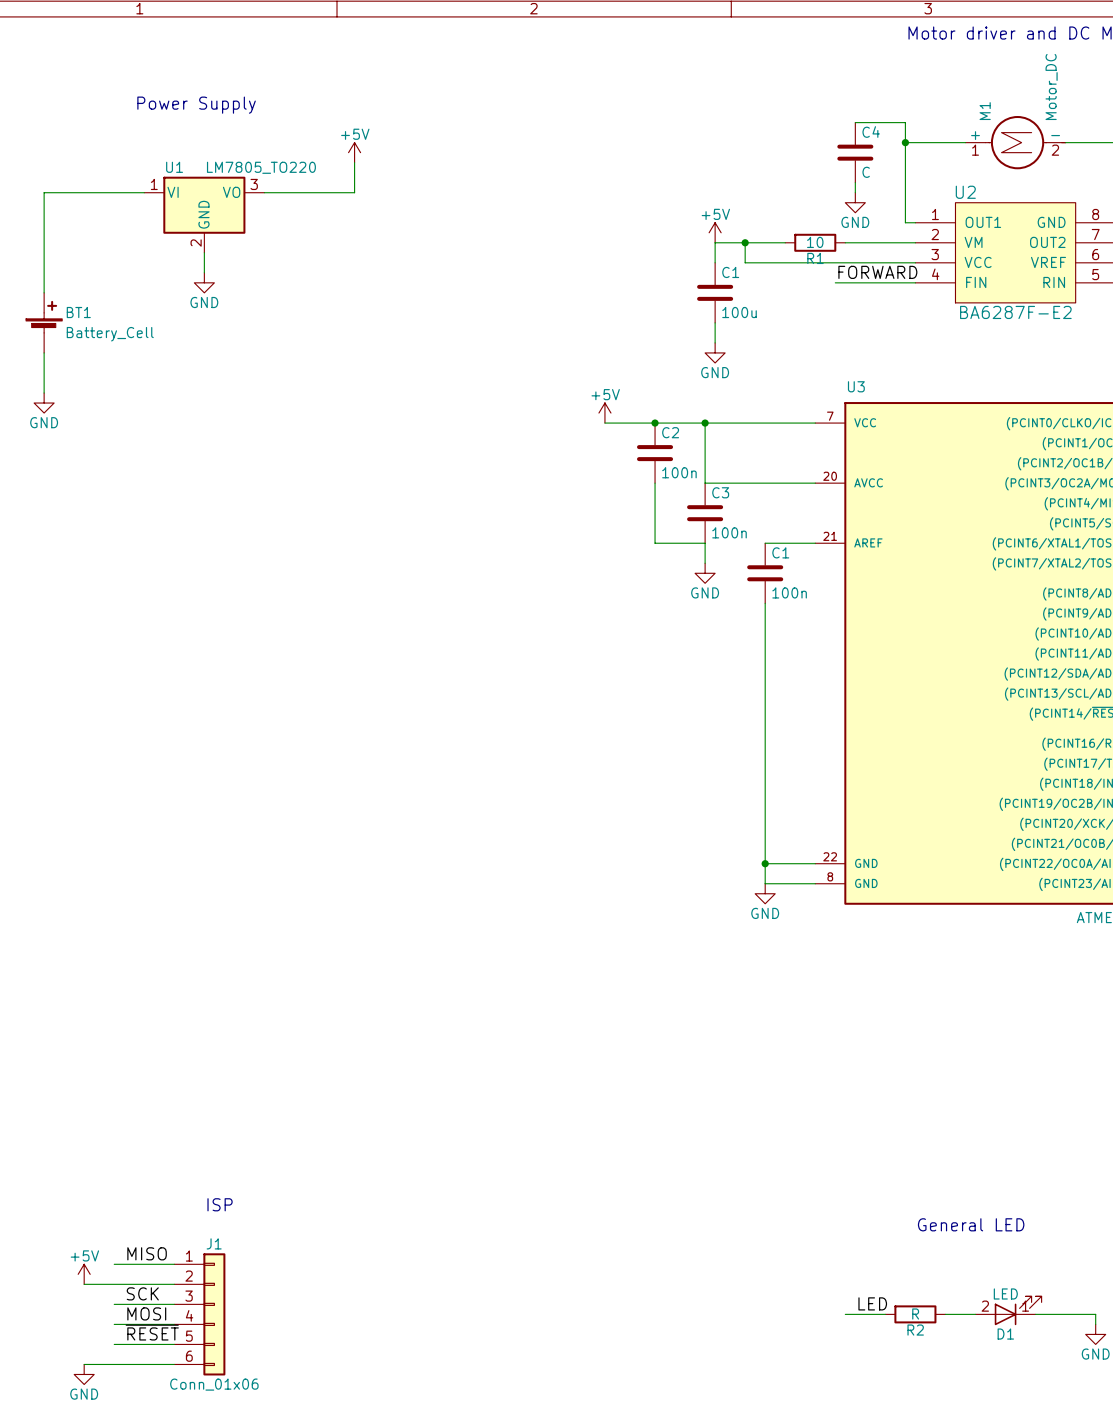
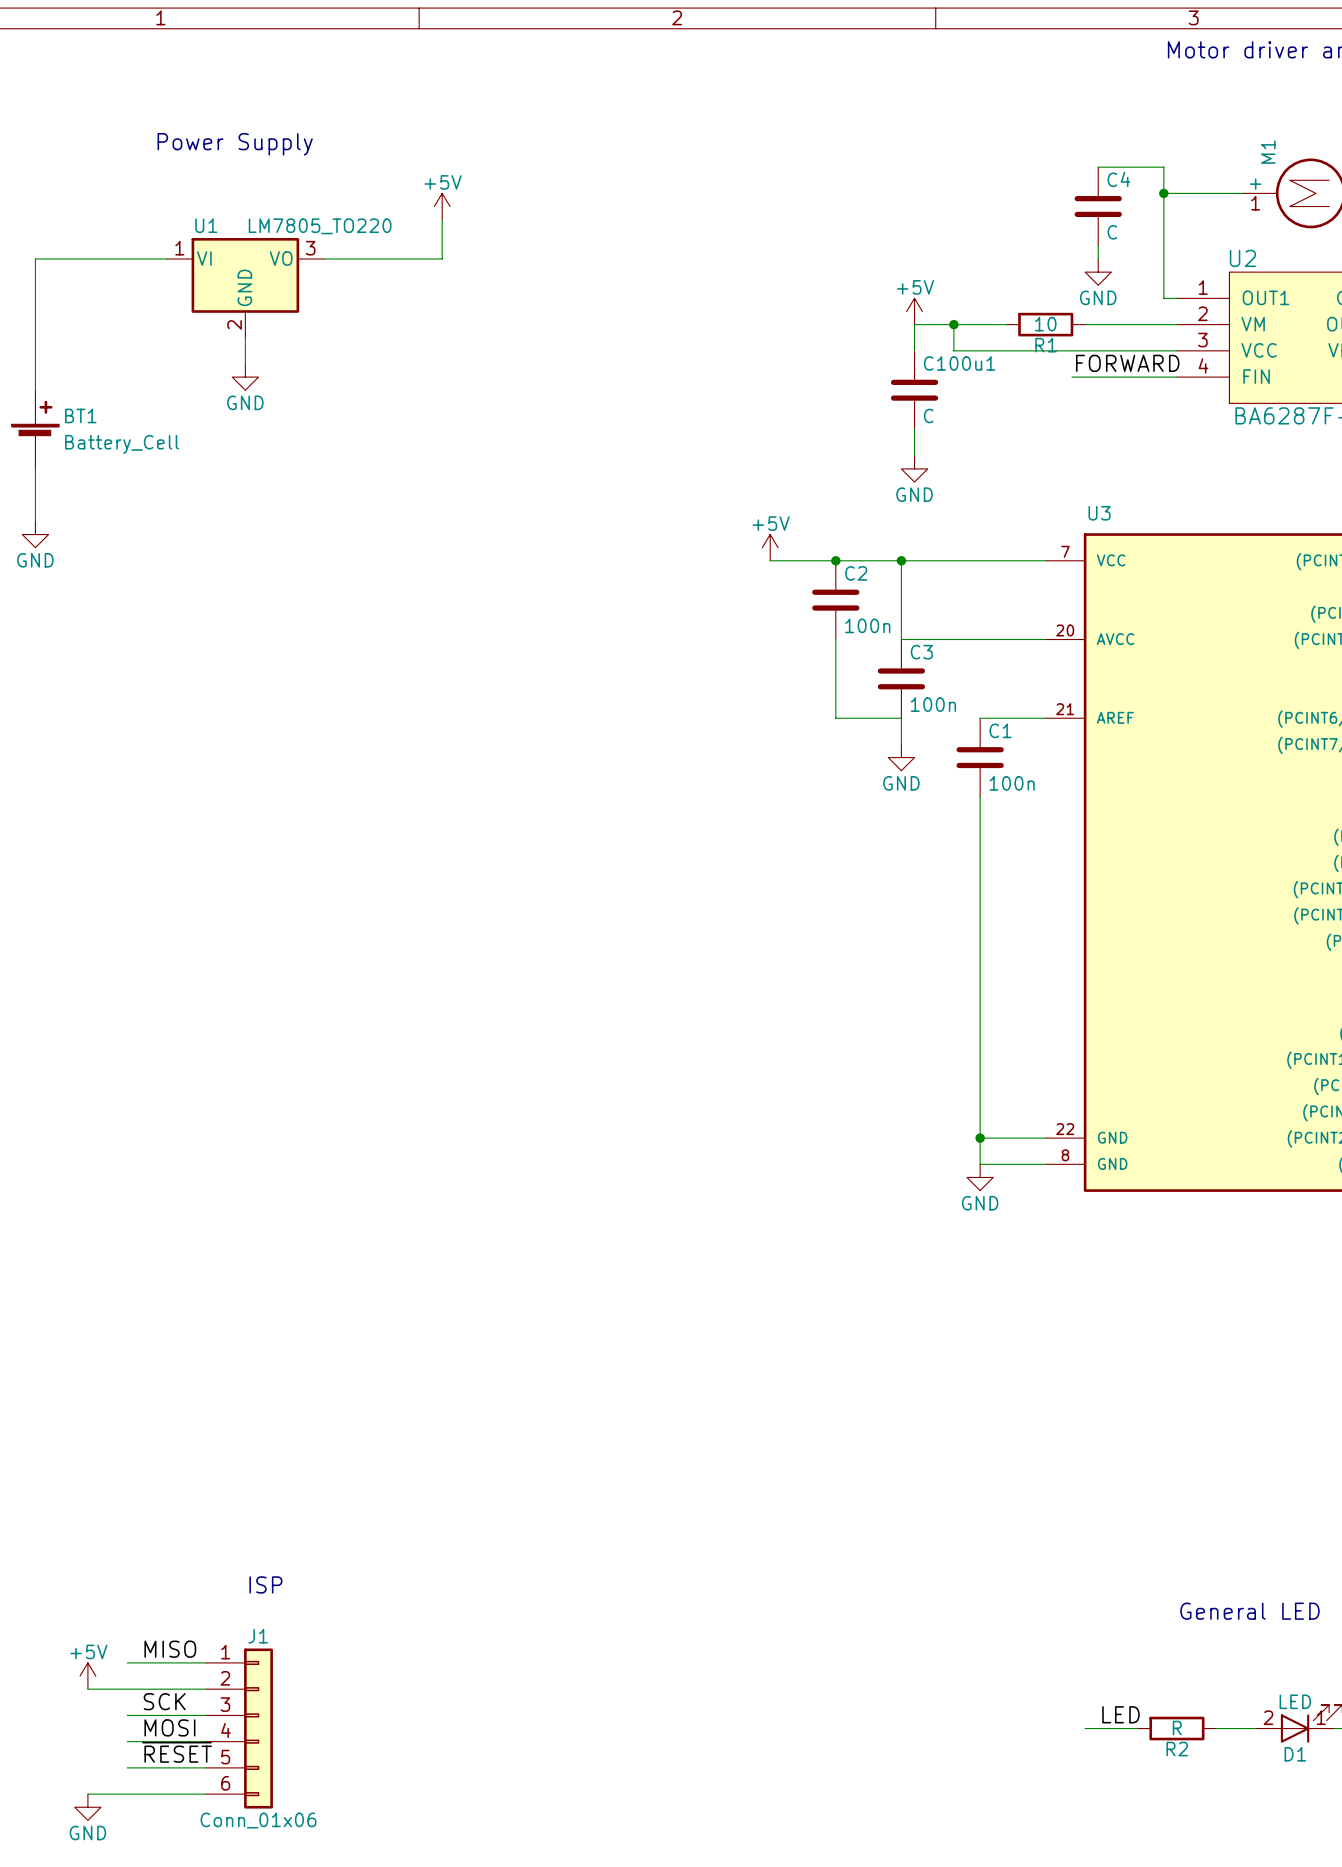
C1 name: C1 (730, 272) -> C100u1 (959, 363)
C1 value: 100u (739, 312) -> C (928, 415)

